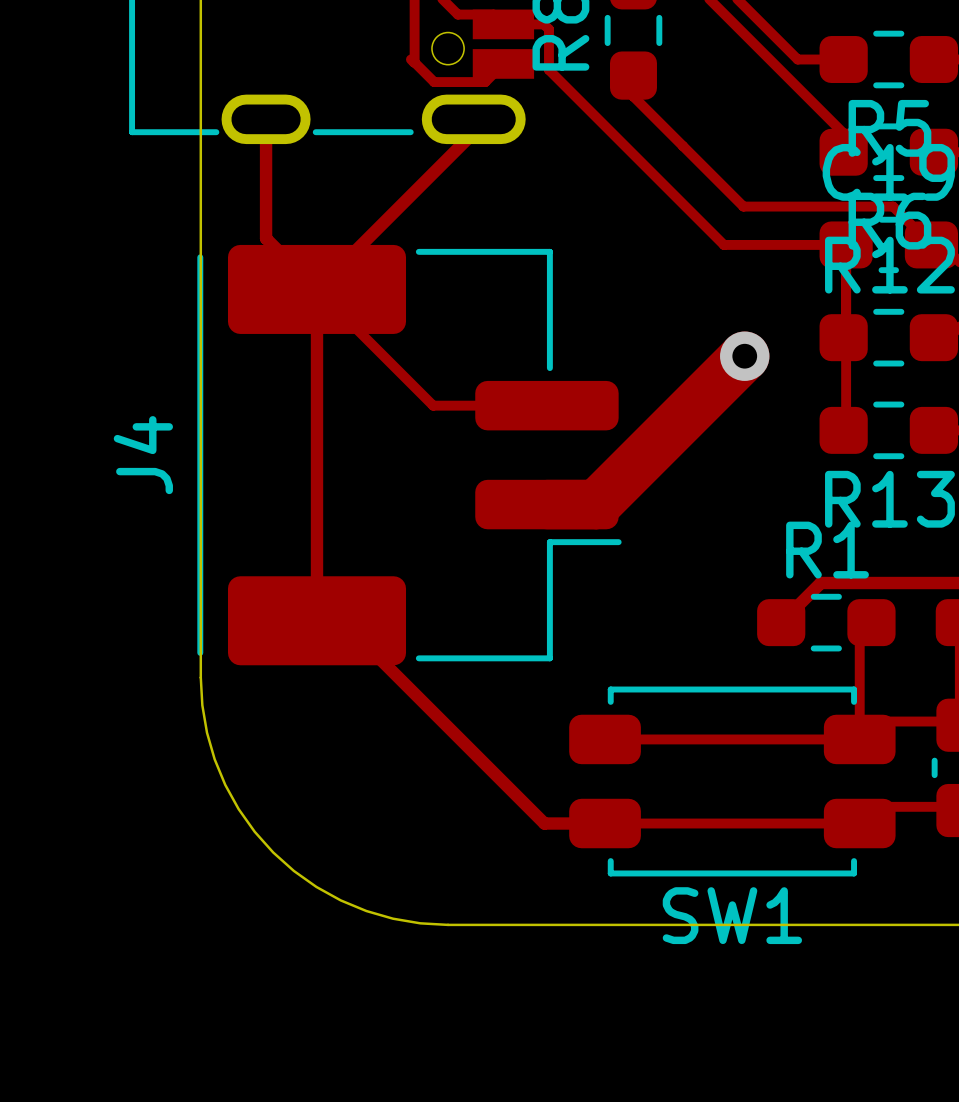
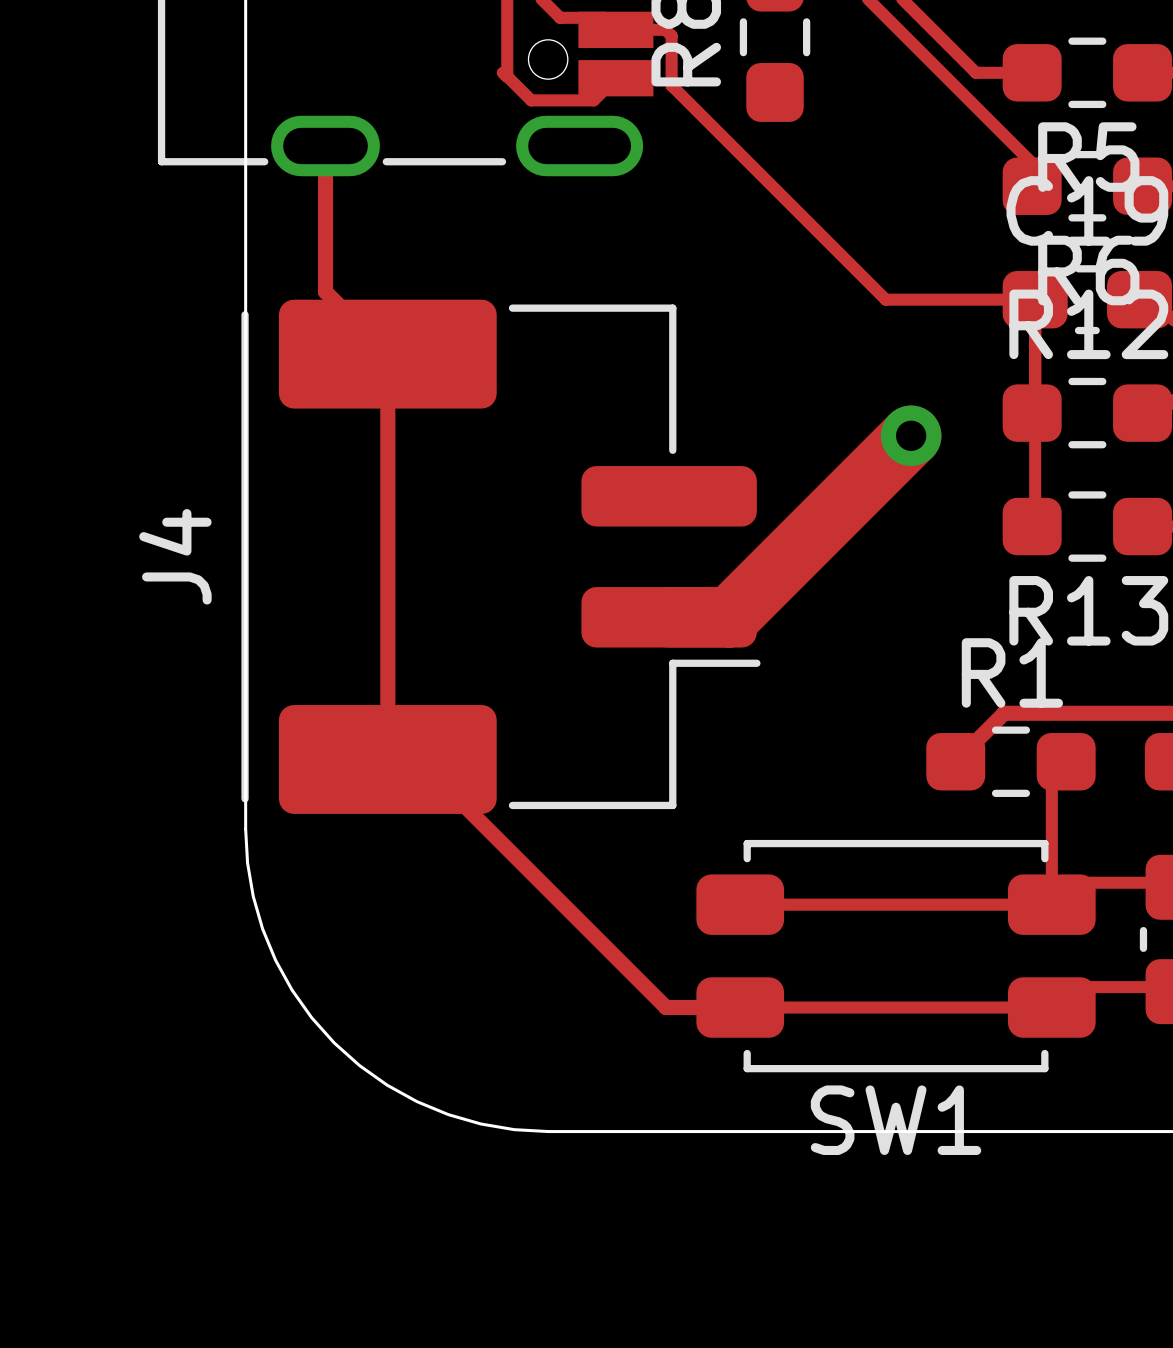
track: (633, 75) (633, 96) (743, 206) (893, 206) (931, 244) -> none
track: (473, 119) (473, 132) (317, 289) (433, 405) (546, 405) -> none

